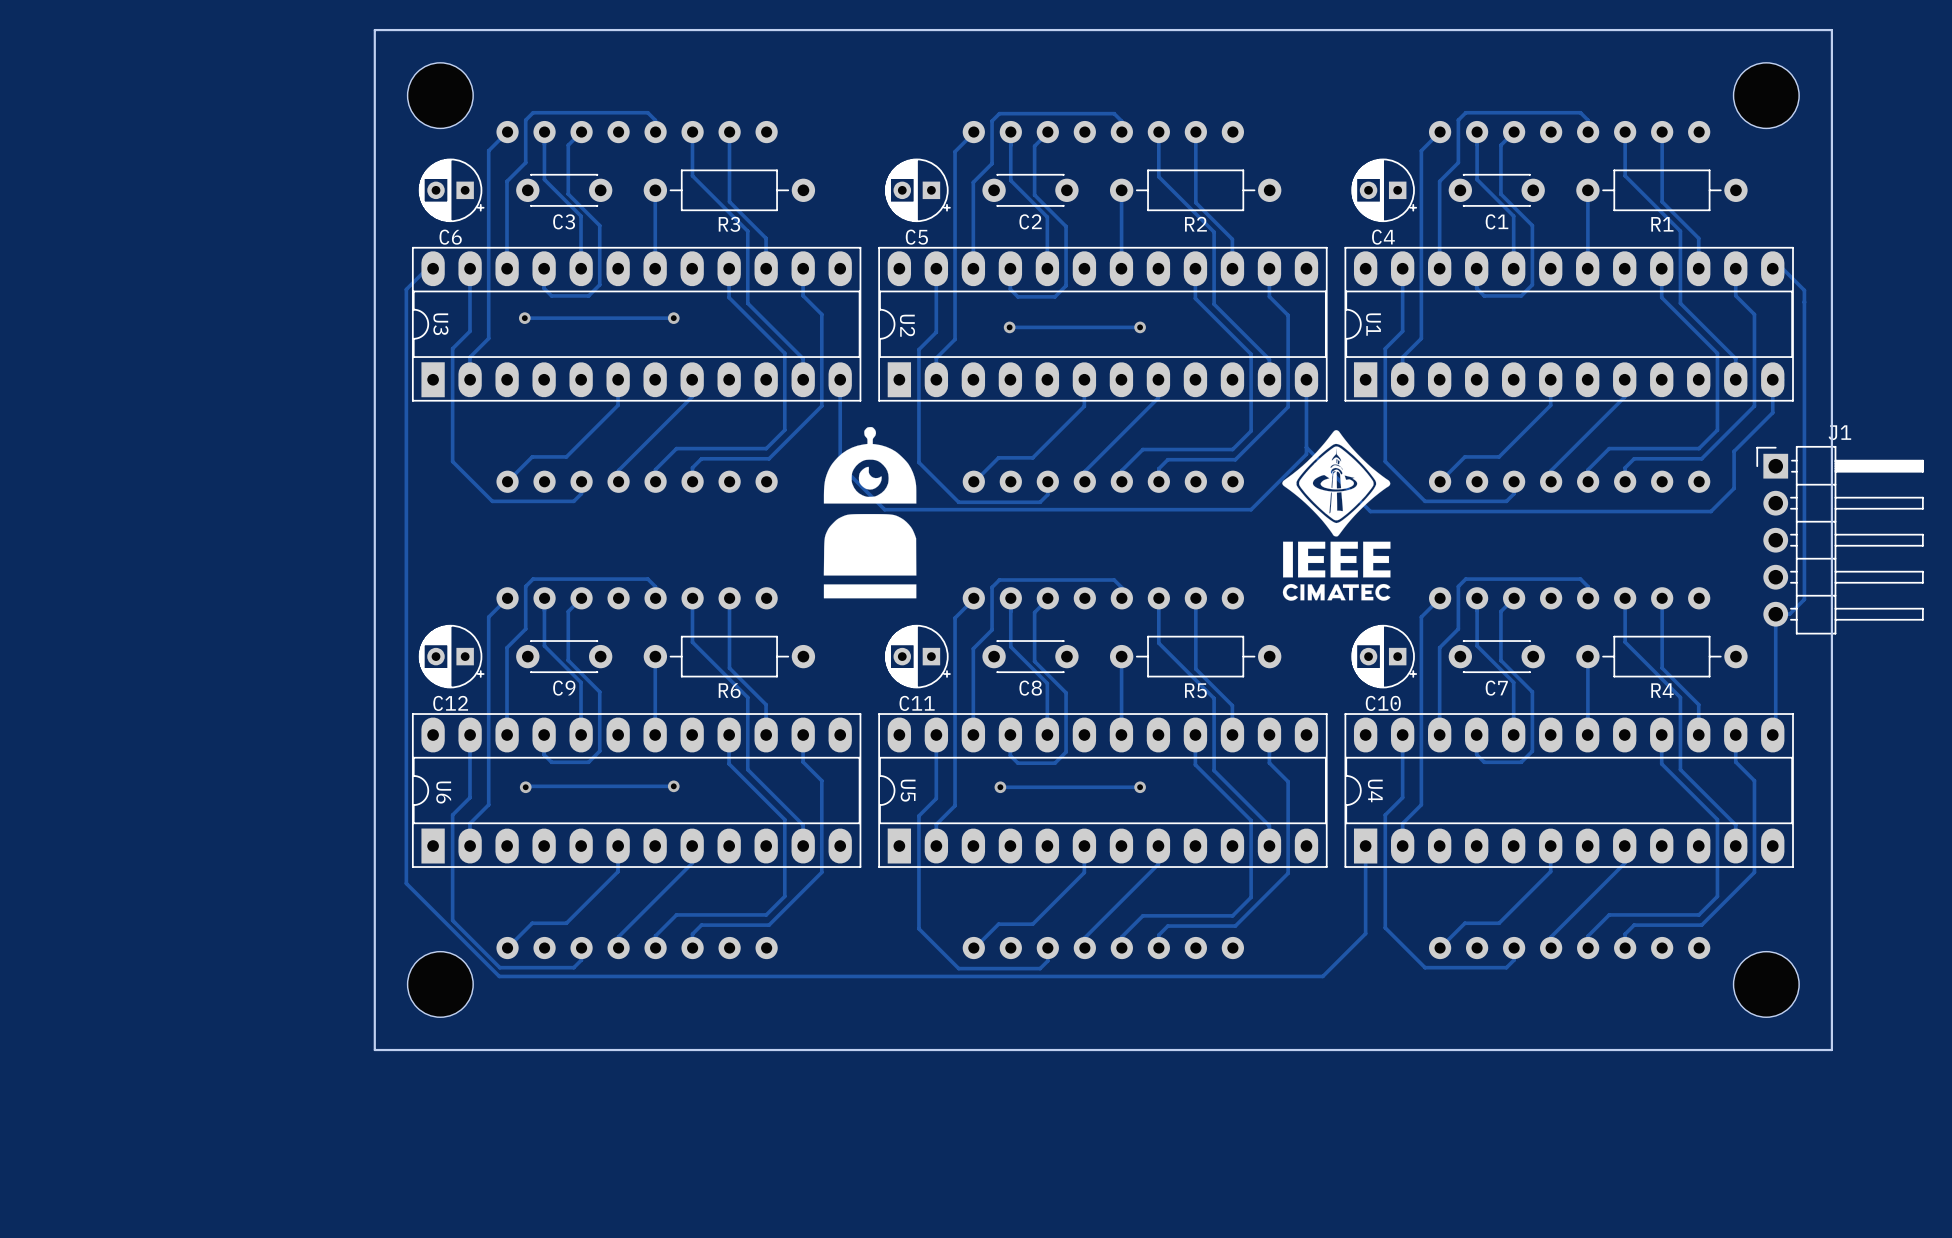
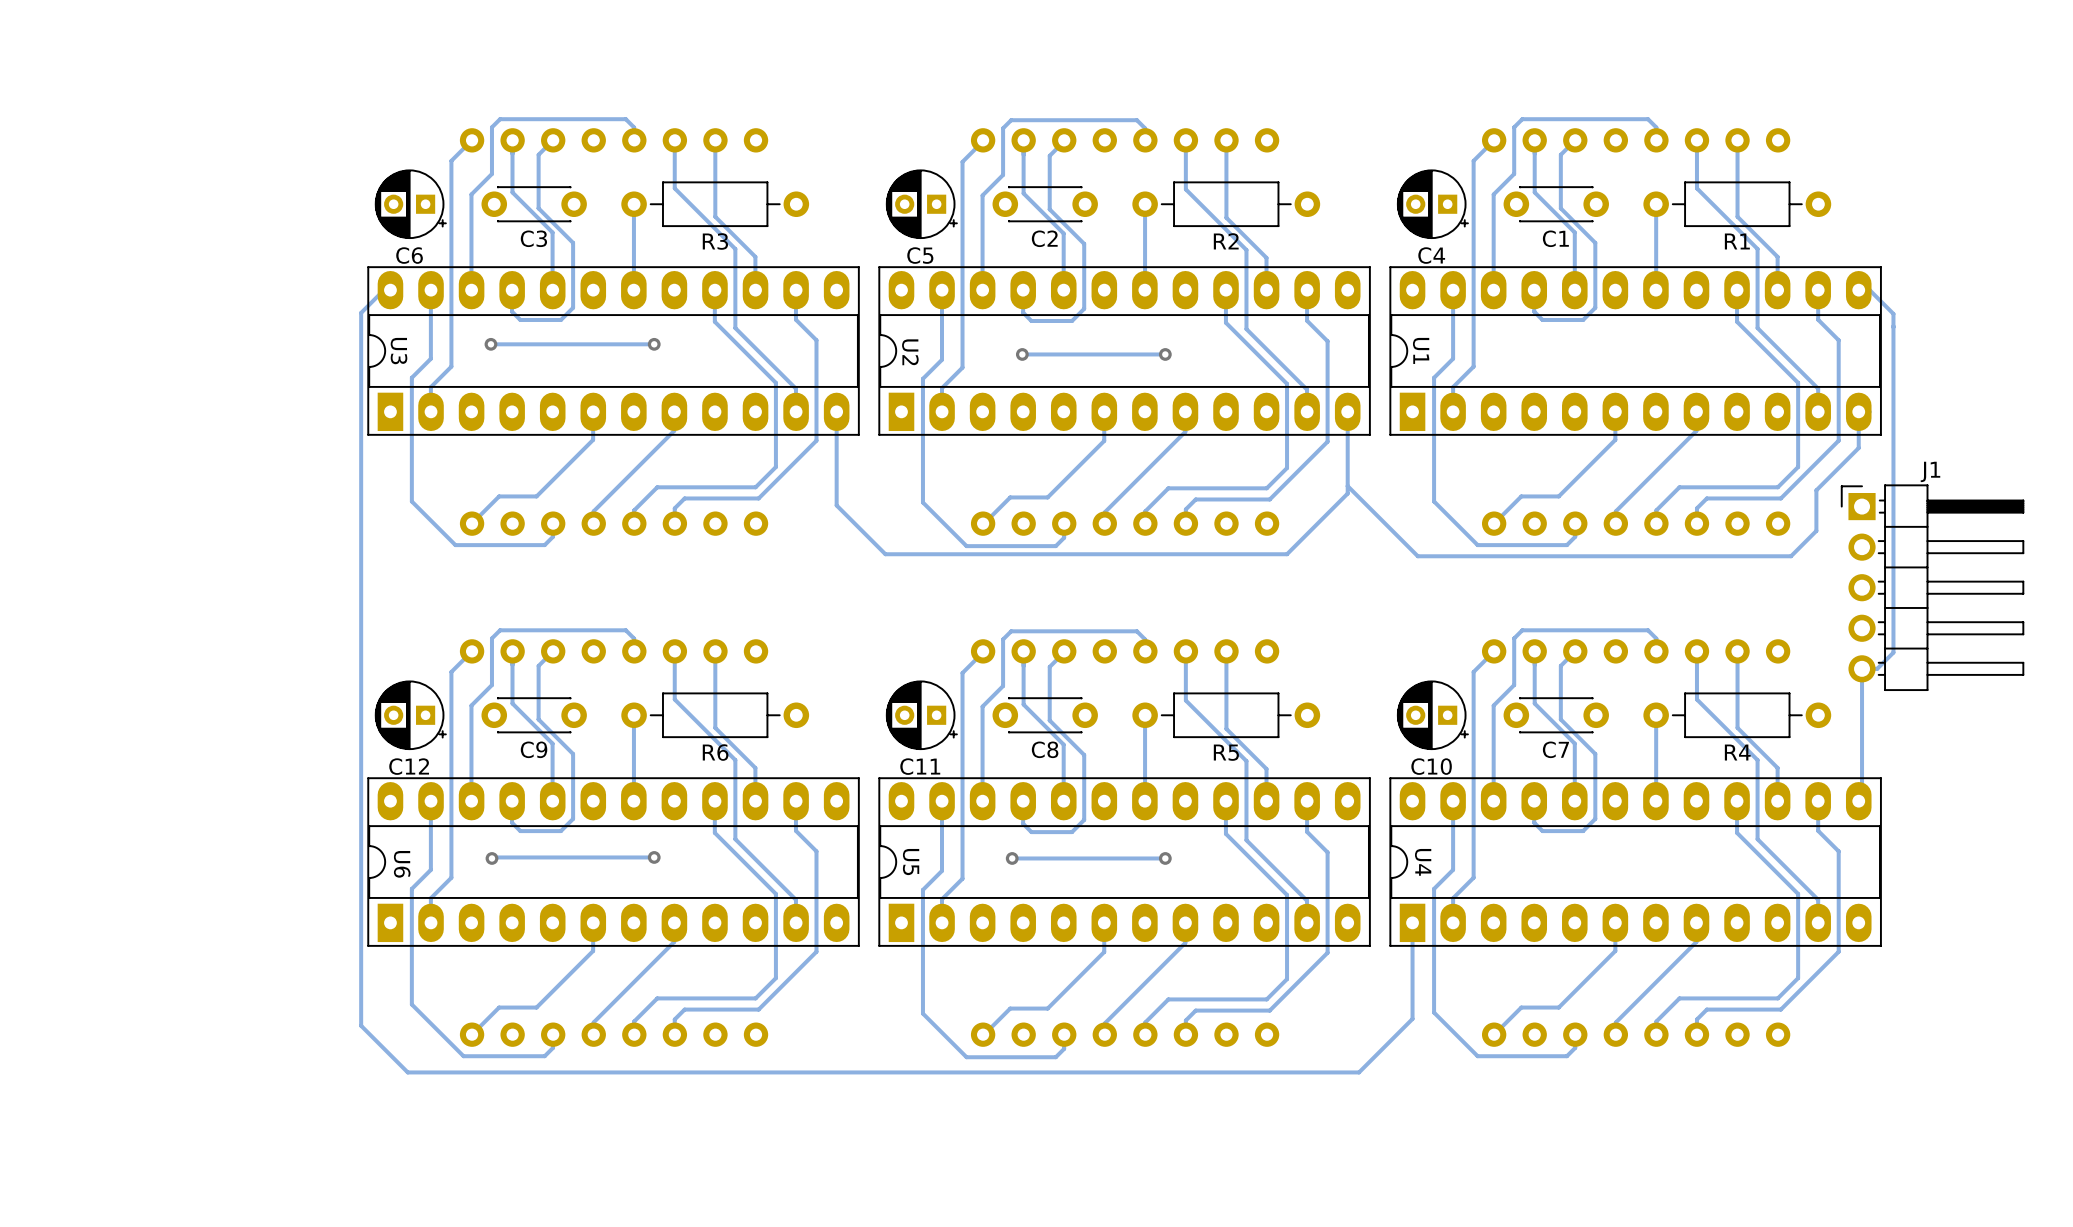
board edge: (1831, 30) (1831, 1050) (374, 1050) (374, 30) (1831, 30) -> none
part: (440, 95) -> none
part: (1766, 95) -> none
drawing: [823, 427, 917, 599] -> none
drawing: [1282, 430, 1391, 601] -> none
track: (406, 883) (499, 976) (1322, 976) -> (361, 963) (361, 1025) (407, 1072) (1359, 1072) (1365, 1065)
part: (440, 984) -> none
part: (1766, 984) -> none

